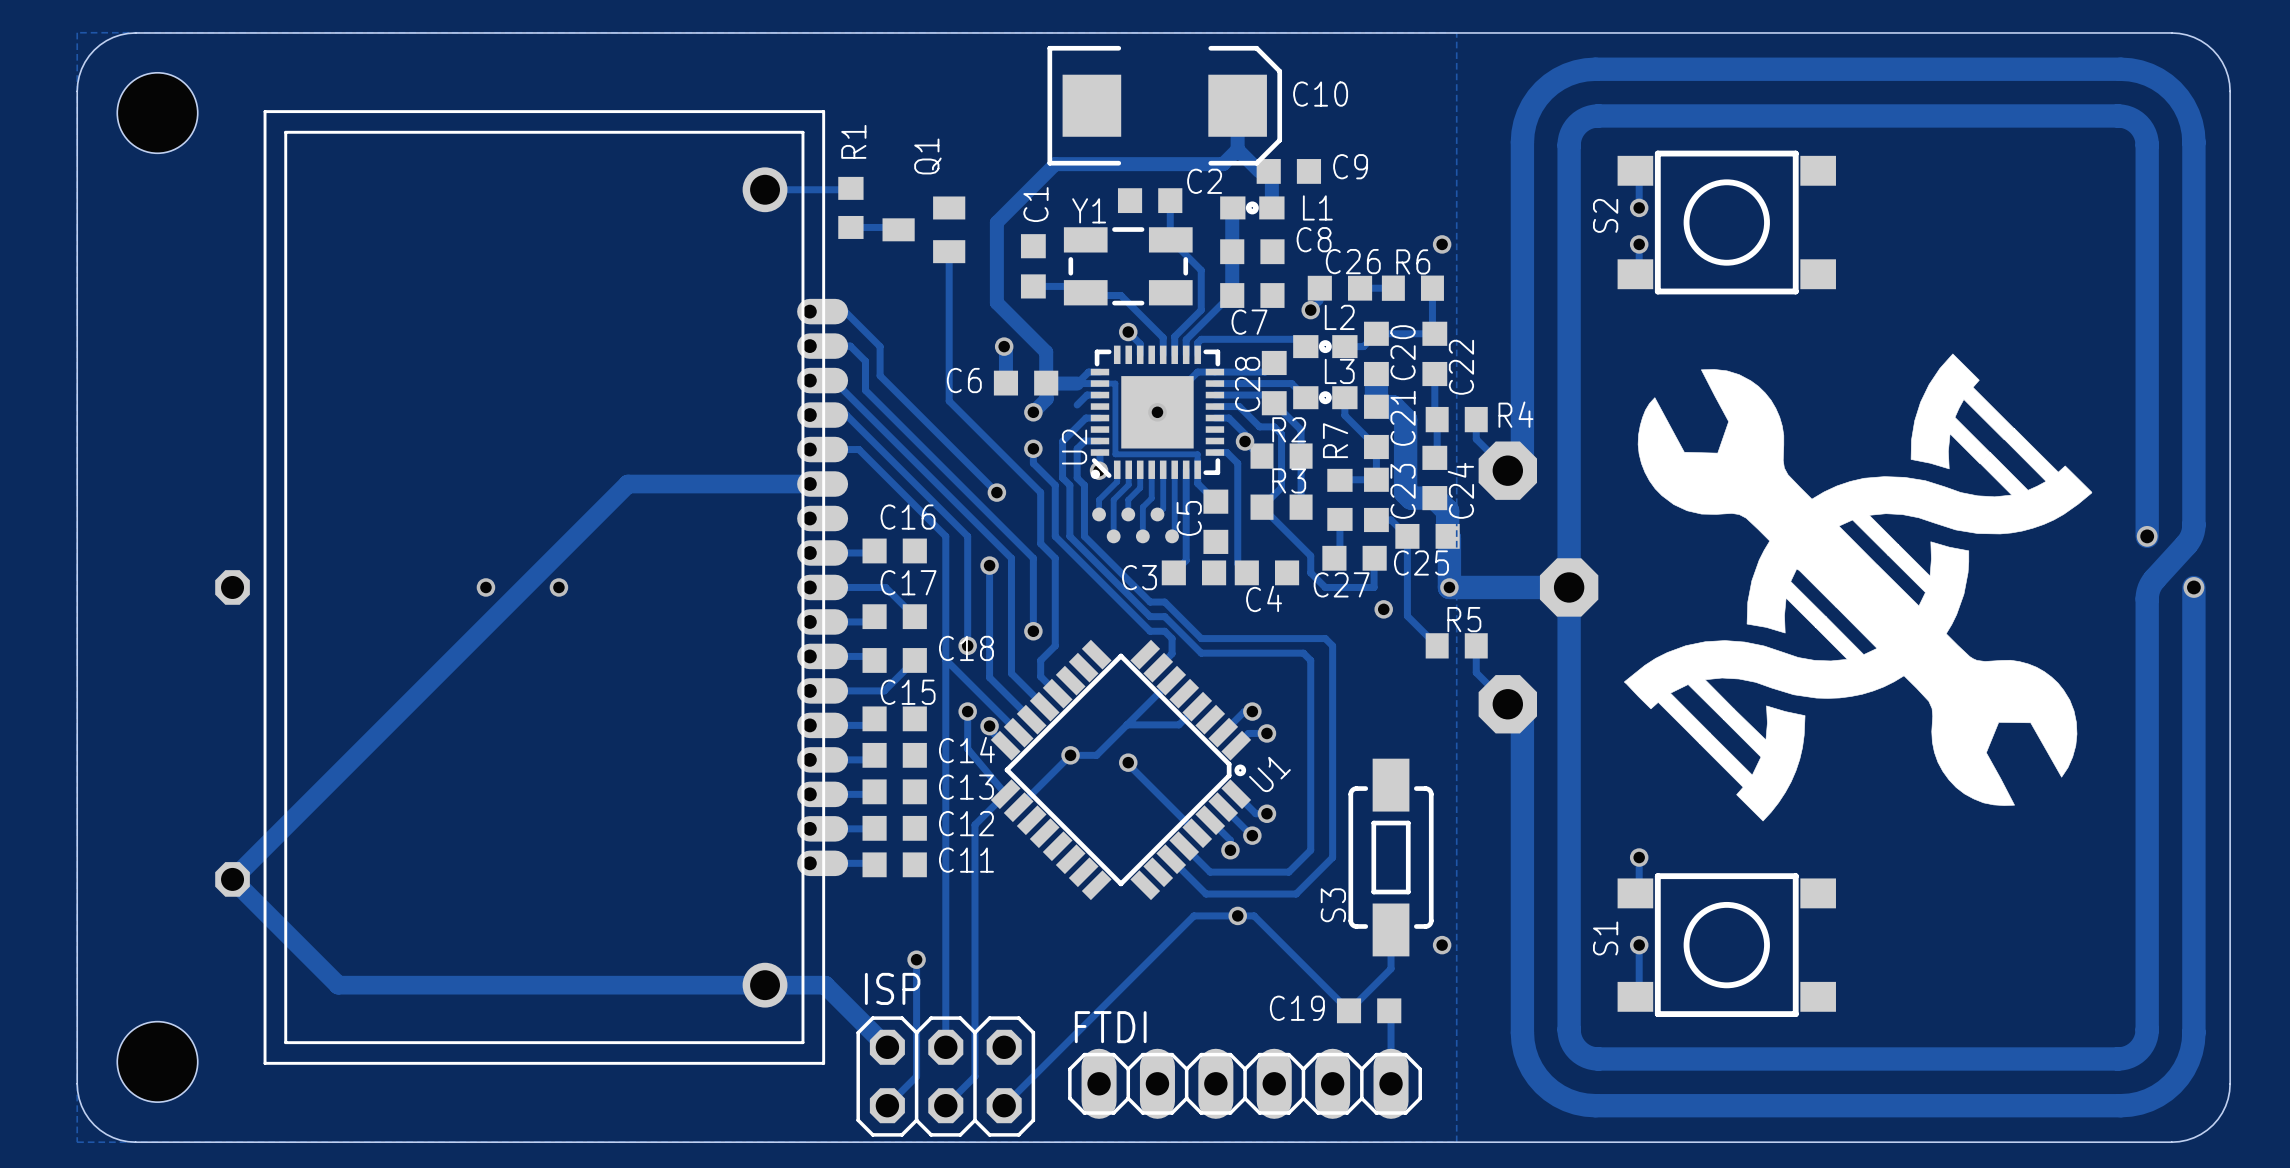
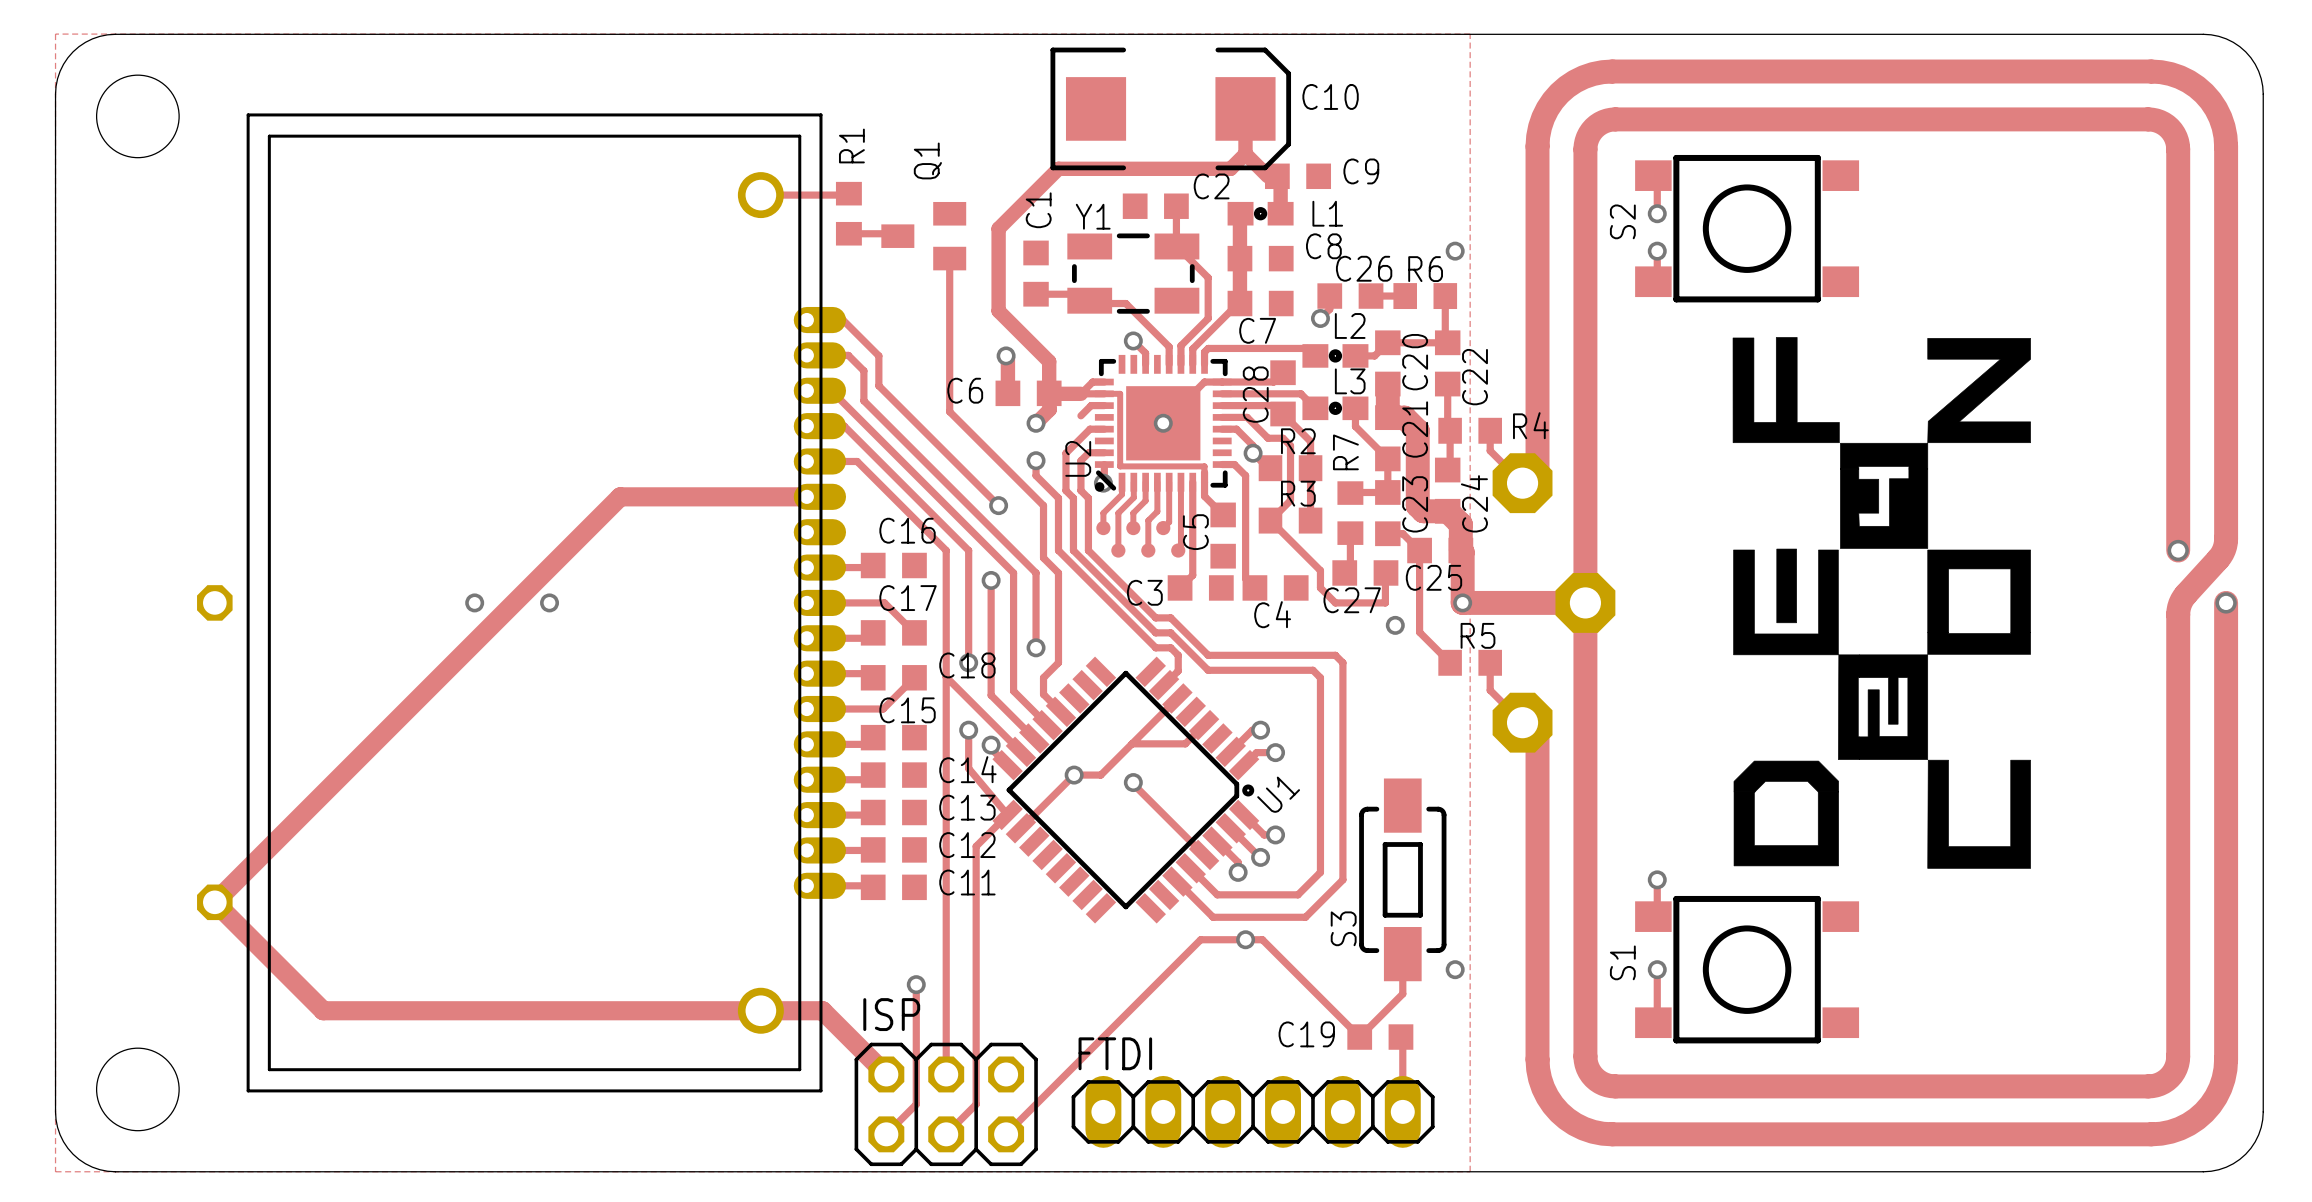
drawing shape: [1624, 353, 2093, 822] -> [1732, 337, 2031, 869]

